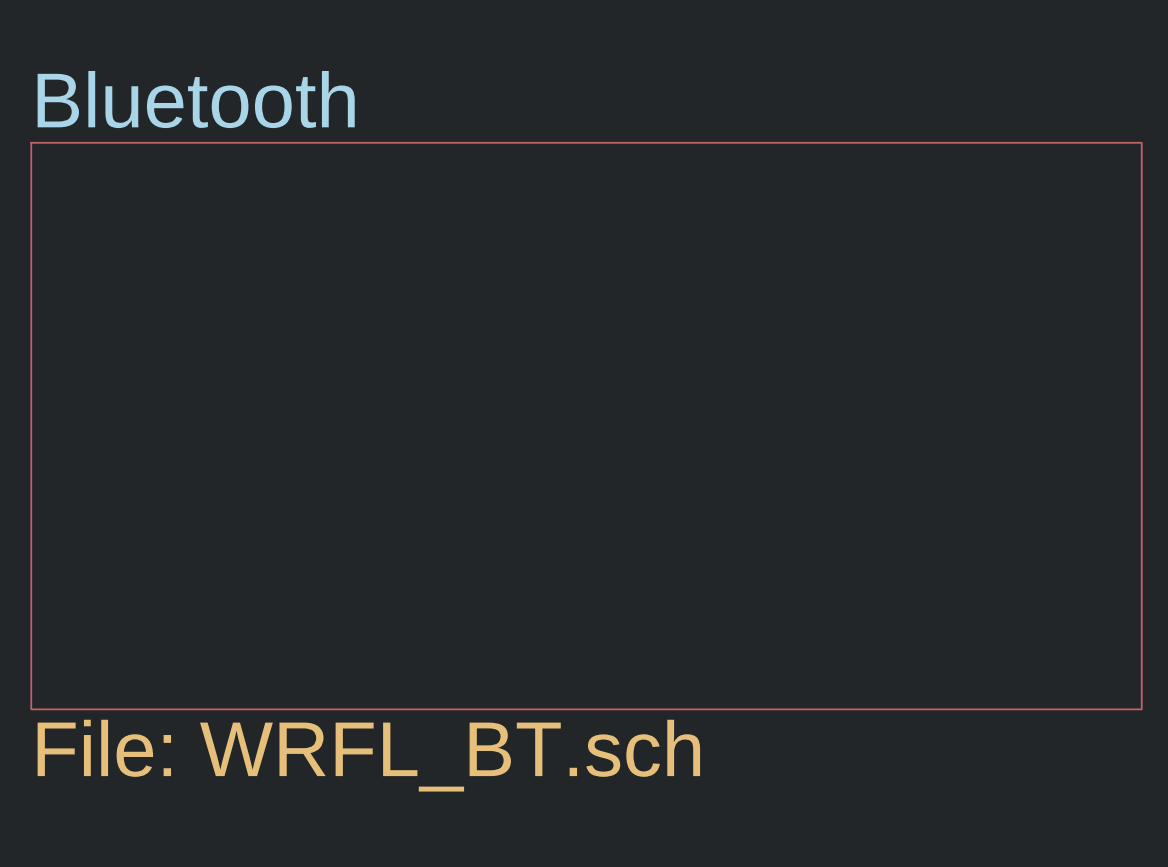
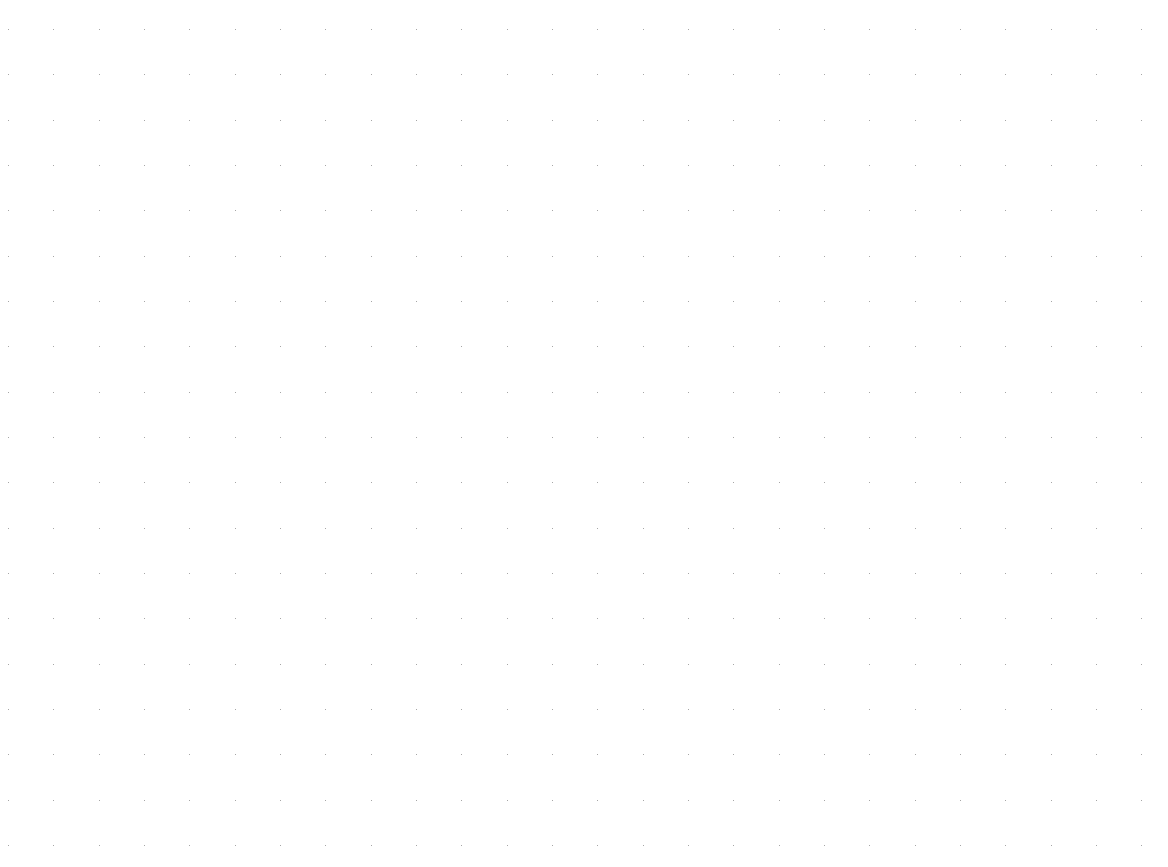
sheet Bluetooth: File: WRFL_BT.sch (586, 426) -> none

